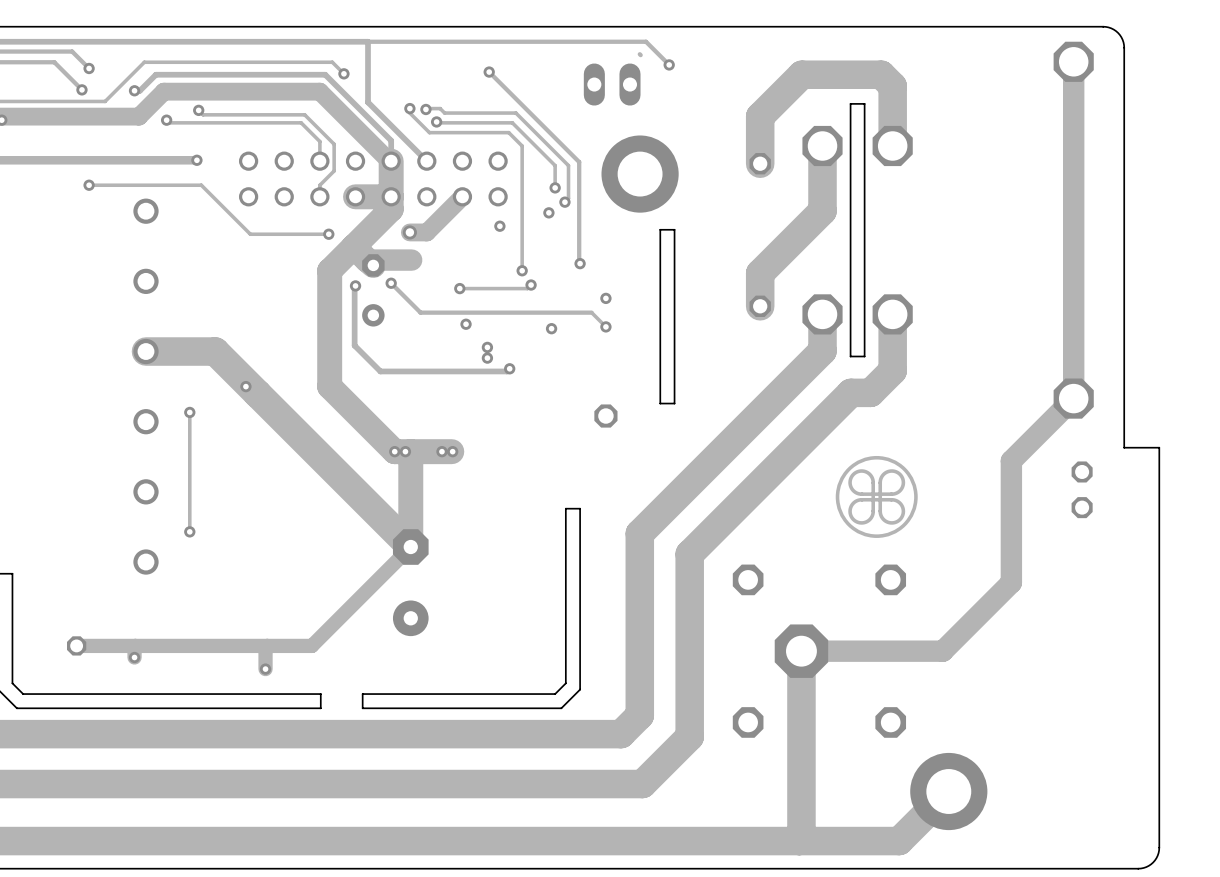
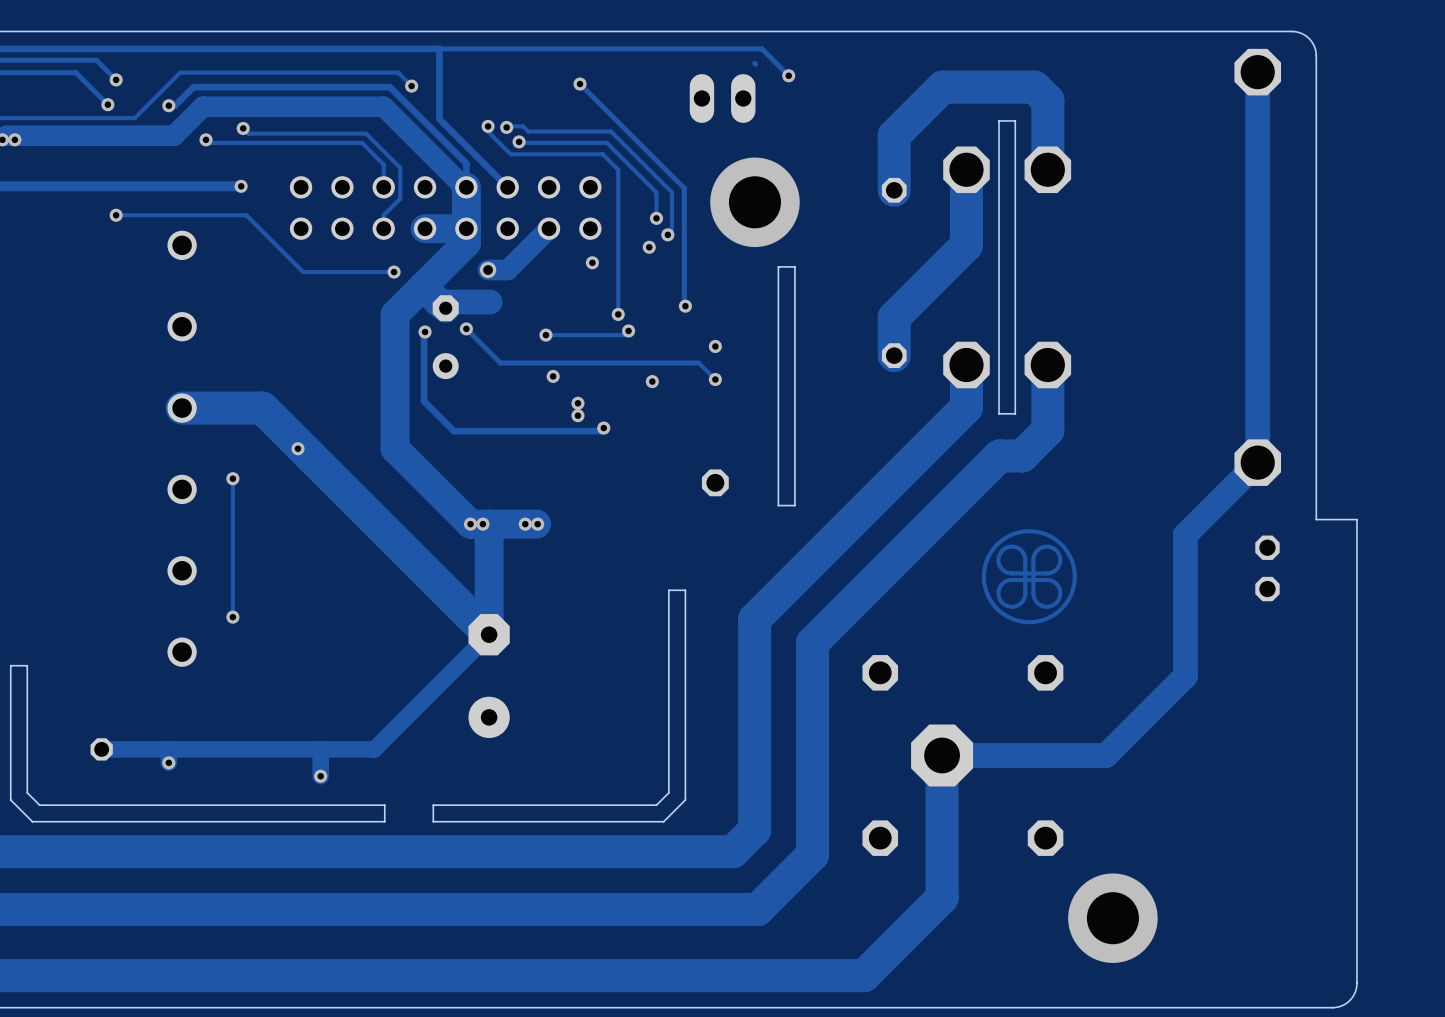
board edge: (674, 403) (660, 403) -> (794, 468) (794, 505) (778, 505) (778, 468)
track: (801, 773) (801, 838) (799, 841) -> (942, 897) (864, 975)
track: (948, 791) (899, 841) (734, 841) -> none

